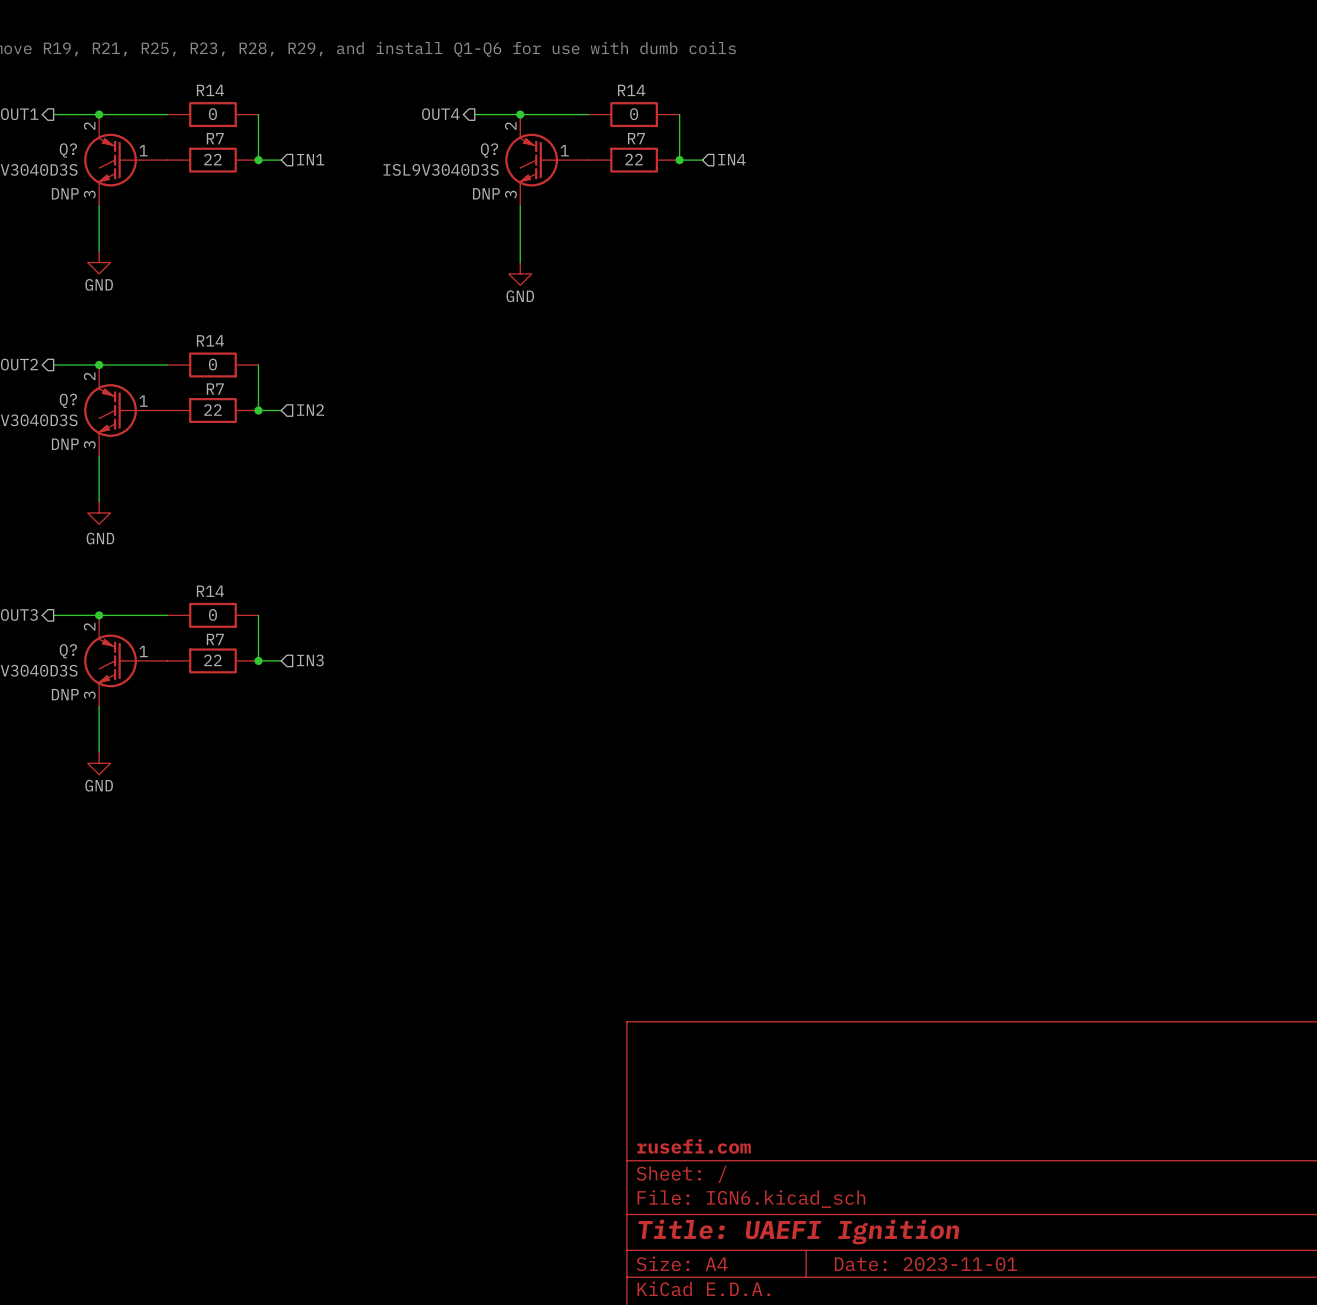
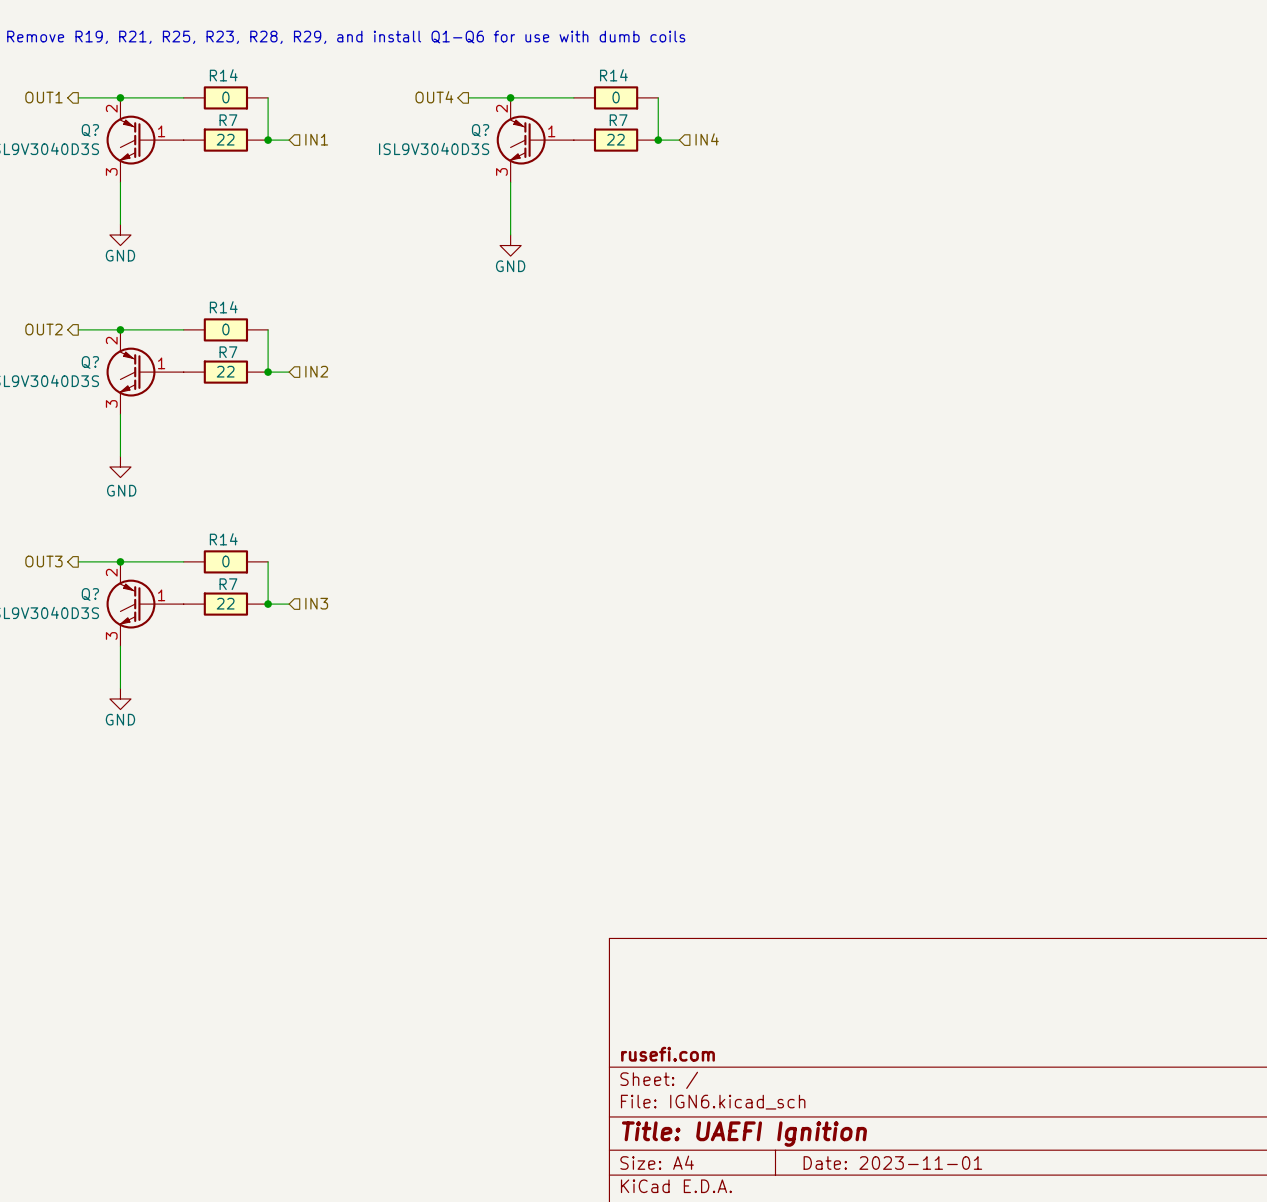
Q? text: DNP (65, 193) -> none
Q? text: DNP (486, 193) -> none
Q? text: DNP (65, 444) -> none
Q? text: DNP (65, 694) -> none

